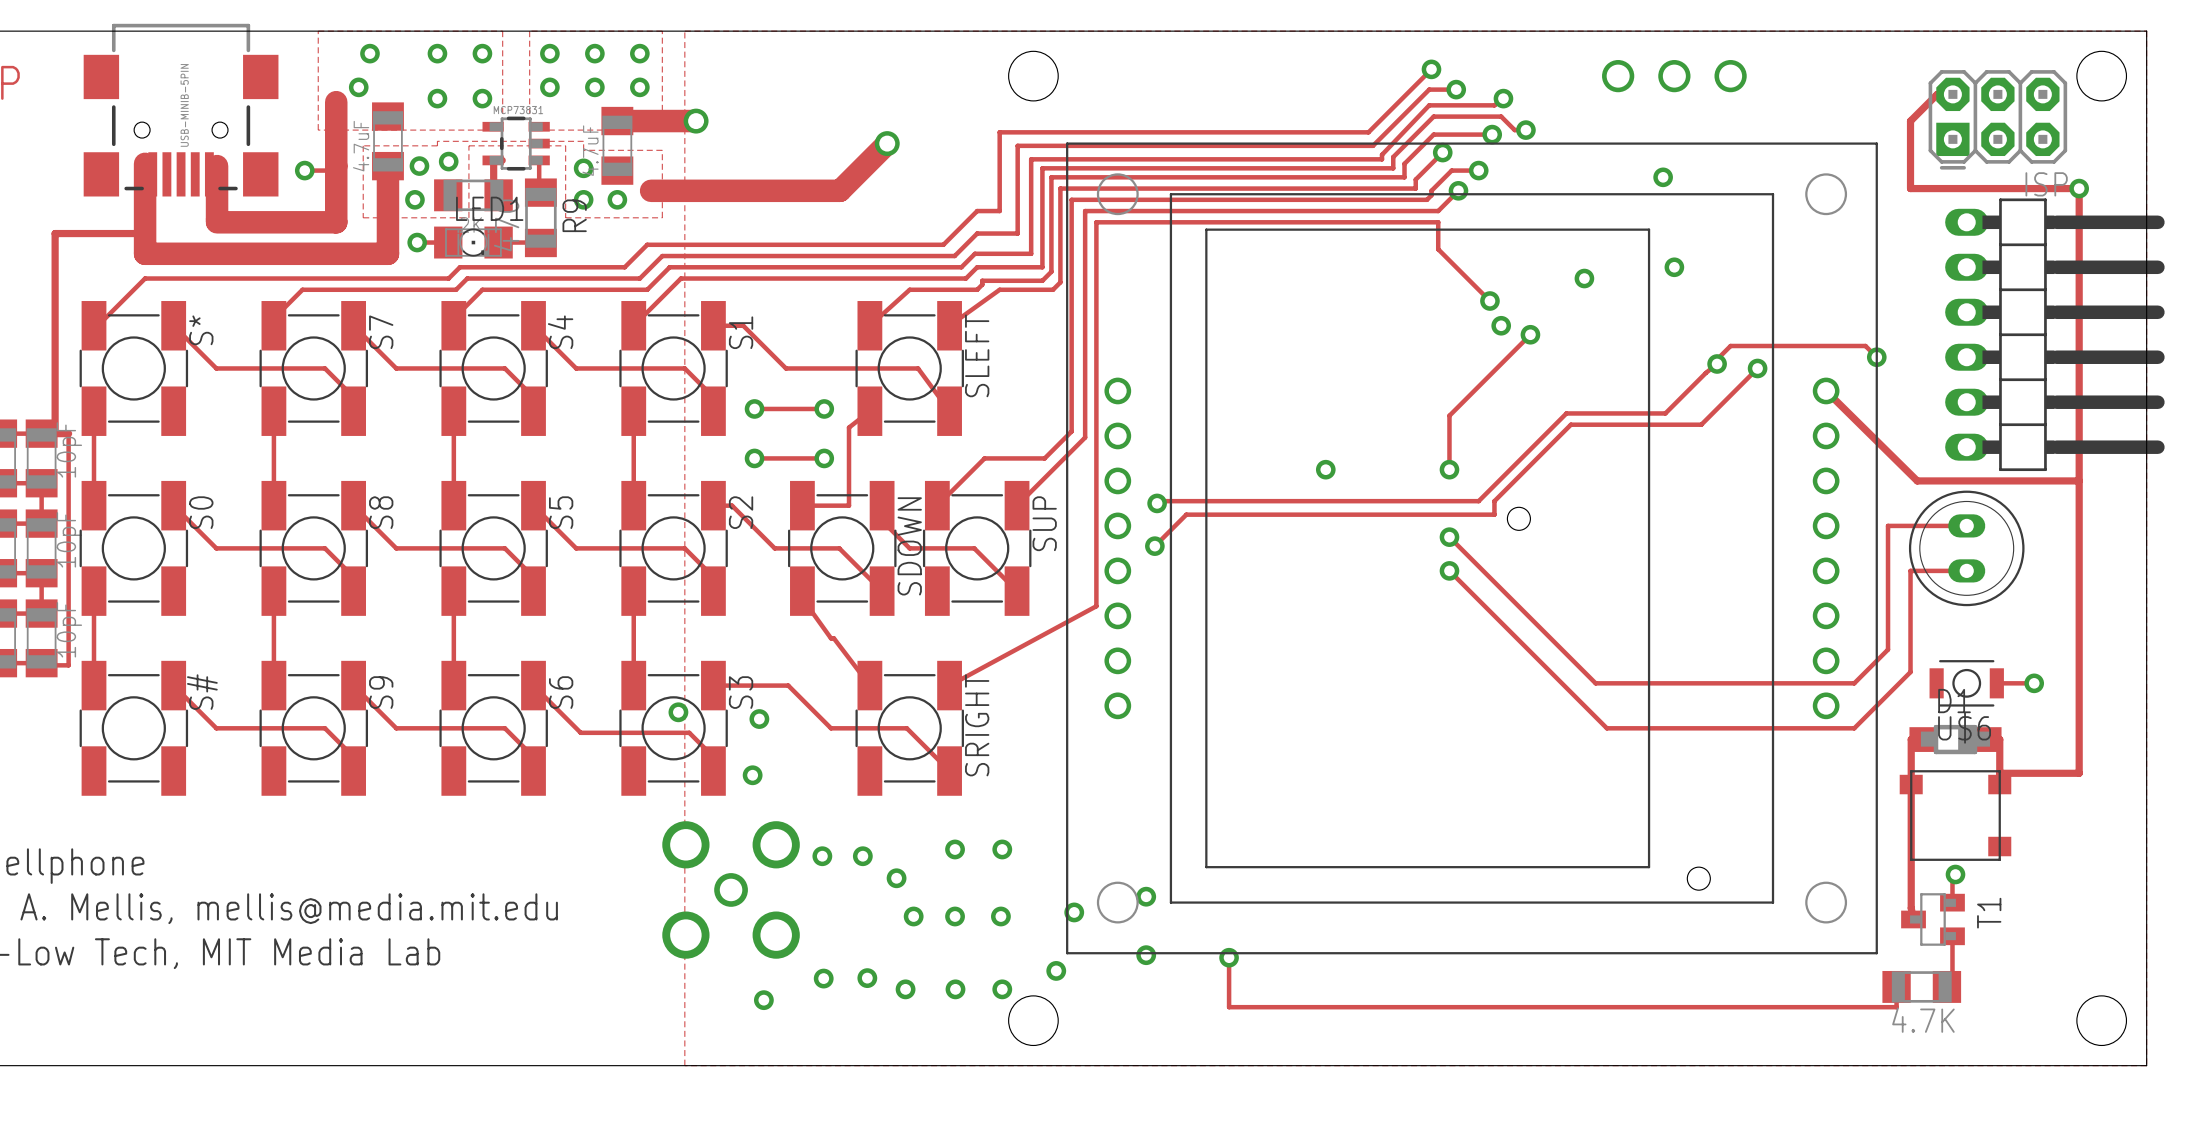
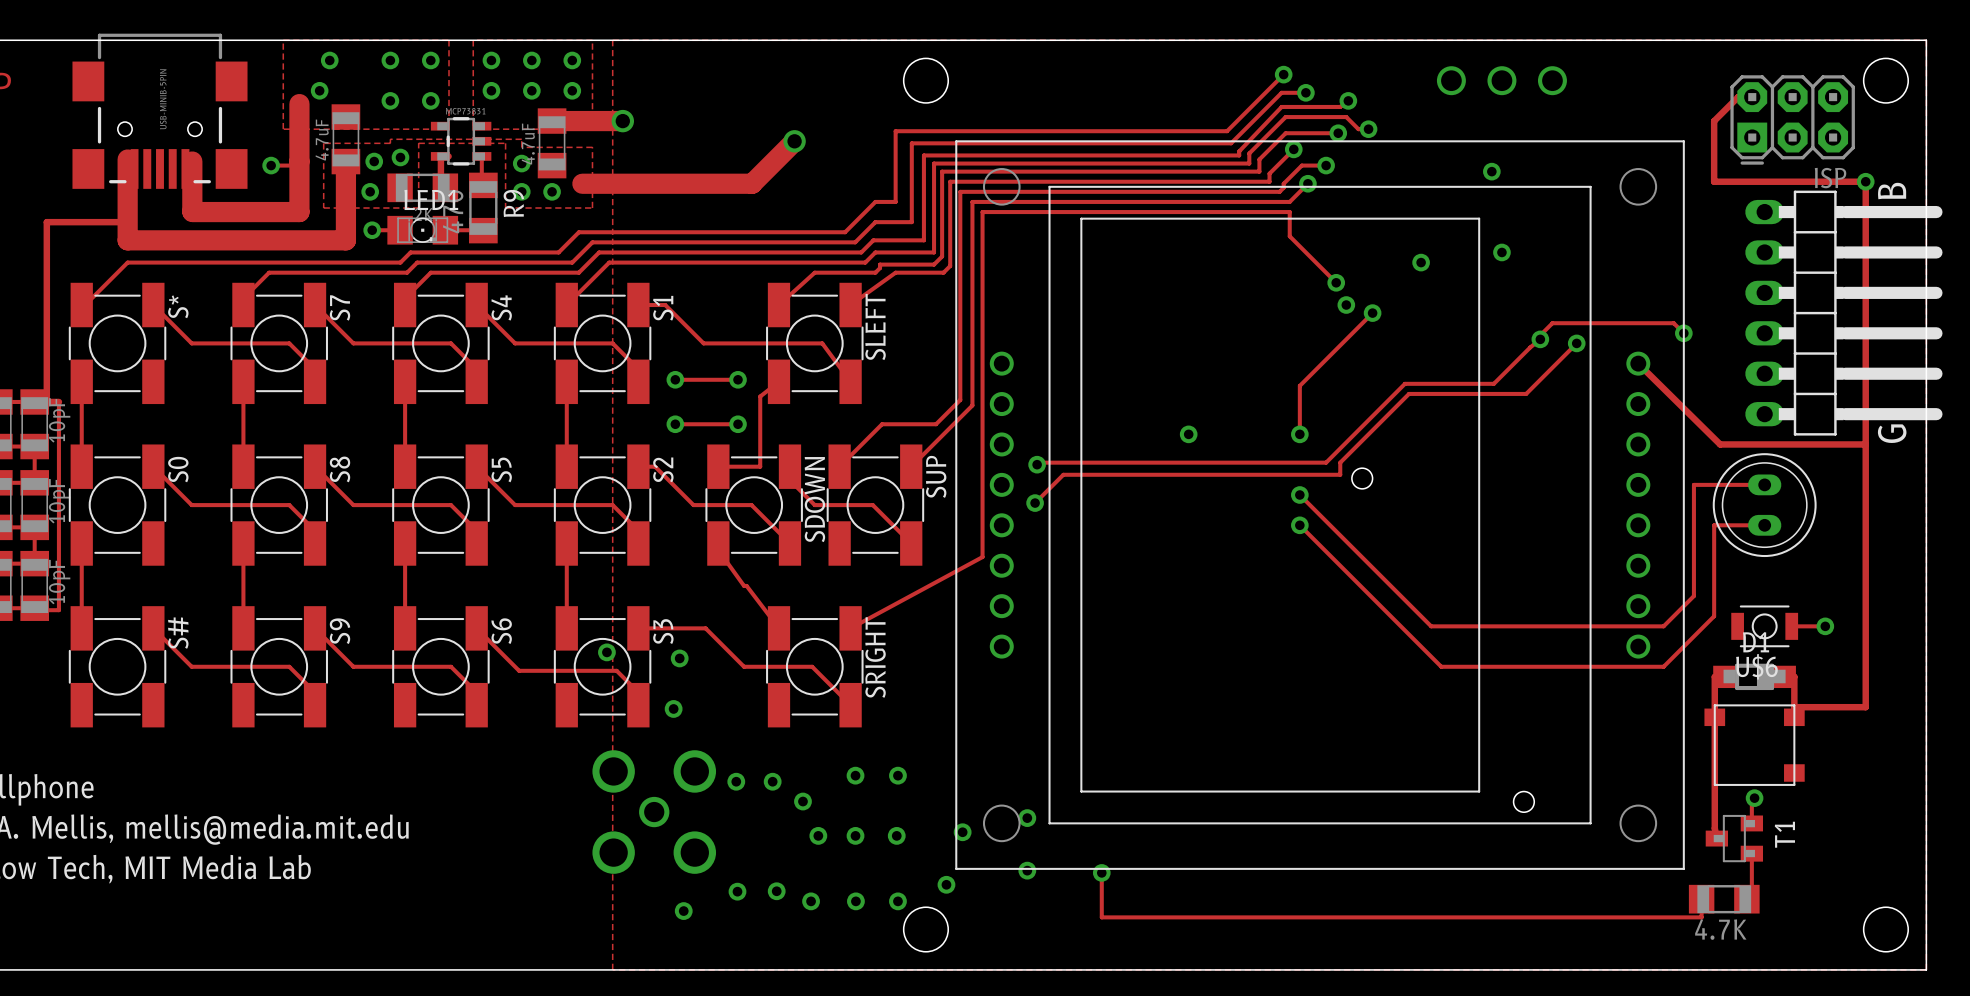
text: none -> B (1892, 191)
text: none -> G (1892, 433)

